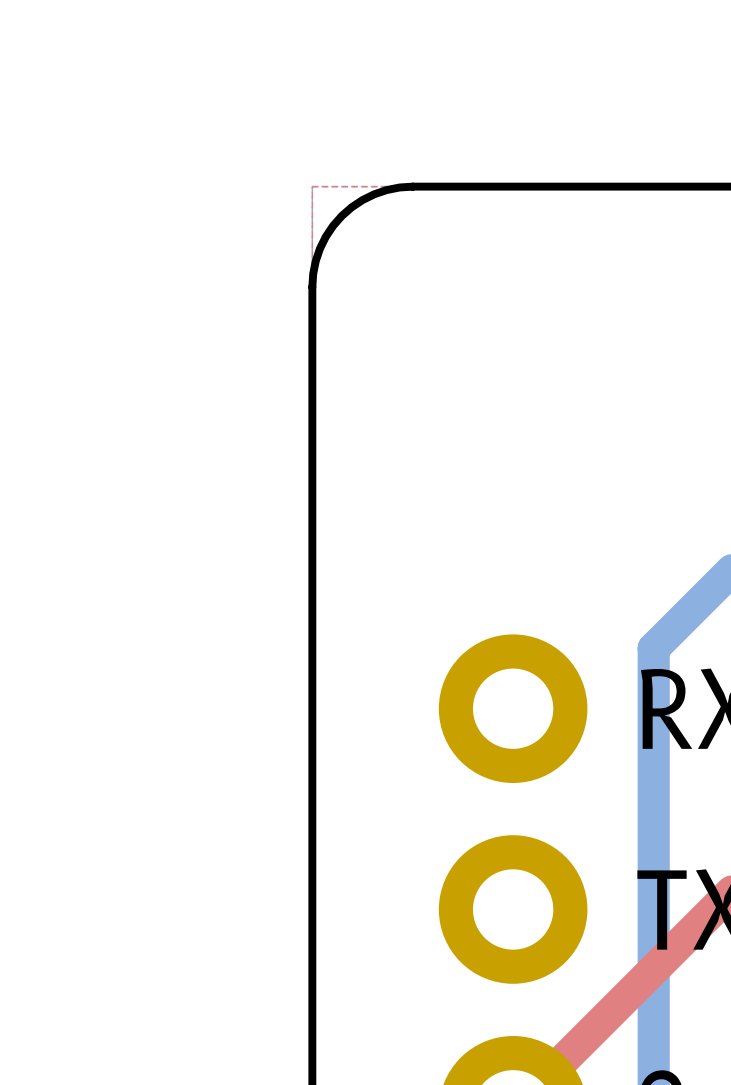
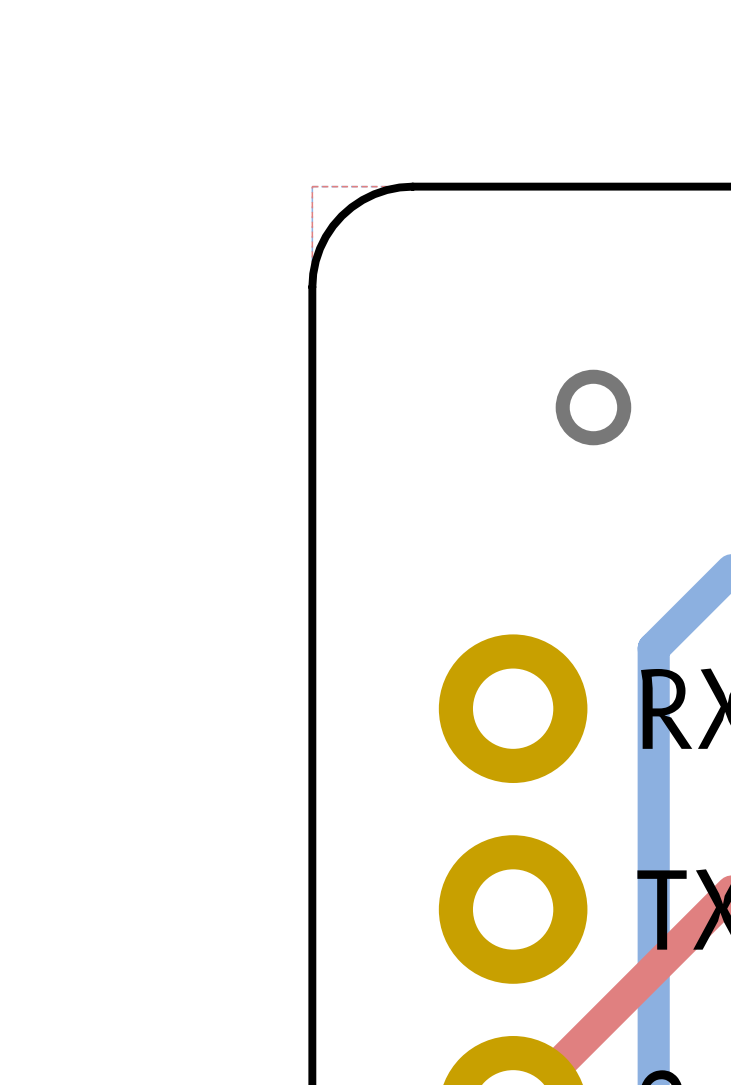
via: none -> (593, 407)

